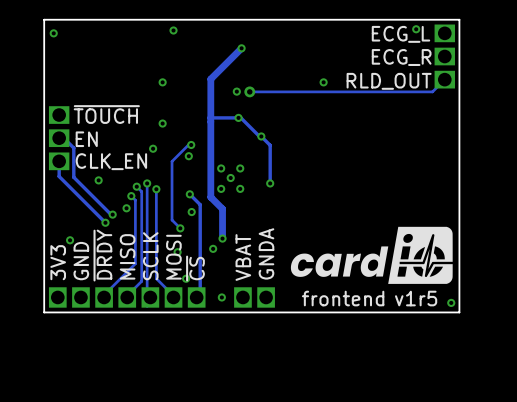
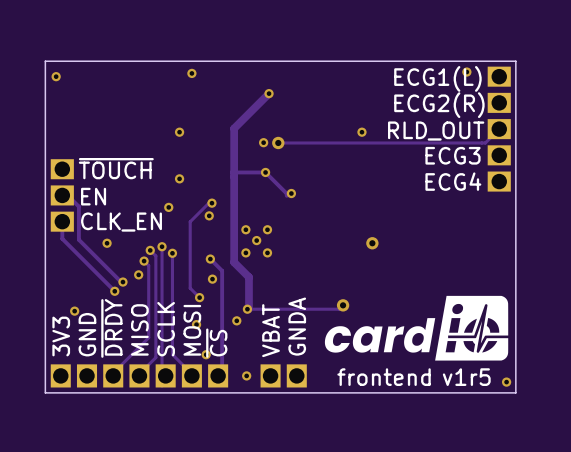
text: ECG_L (400, 34) -> ECG1(L) (437, 78)
text: ECG_R (401, 57) -> ECG2(R) (439, 105)
part: none -> (499, 155)
text: none -> ECG3 (453, 155)
track: (238, 117) (240, 117) (270, 145) (270, 183) -> (265, 172) (286, 195)
text: none -> ECG4 (453, 181)
part: none -> (499, 181)
via: none -> (372, 243)
via: (270, 183) -> none
track: (222, 208) (222, 238) -> (247, 275) (248, 309) (339, 309) (343, 305)
via: none -> (343, 305)

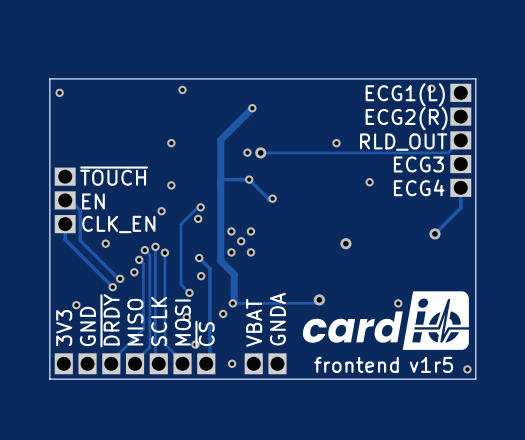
via: none -> (369, 182)
track: none -> (460, 187) (460, 208) (434, 233)
via: none -> (434, 233)
via: none -> (398, 303)

